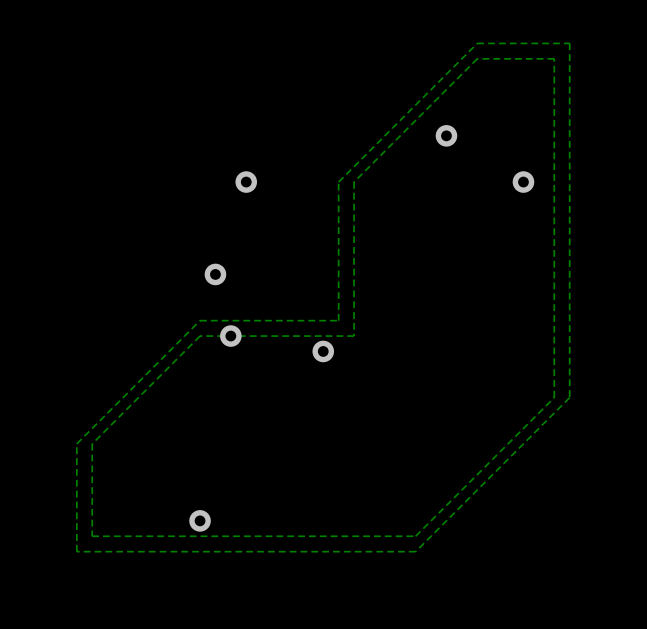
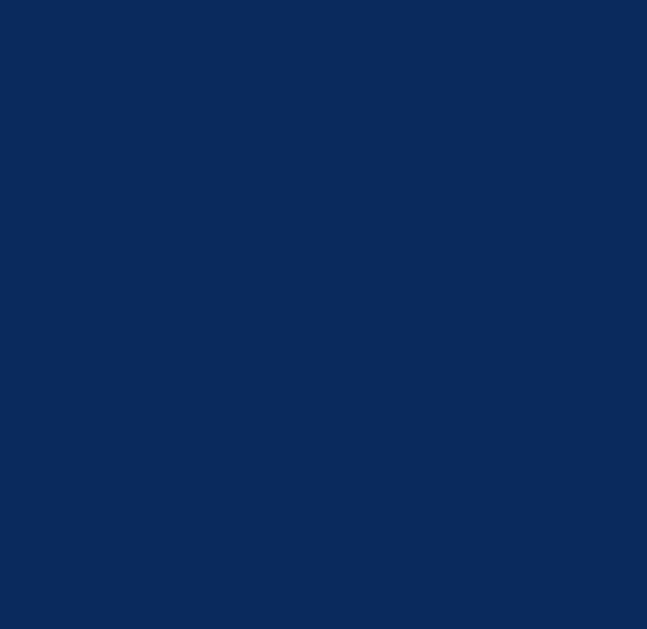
zone outline: (569, 43) (477, 43) (338, 182) (338, 320) (200, 320) (76, 443) (76, 551) (415, 551) (569, 397) (569, 43) -> none
zone outline: (554, 58) (554, 397) (415, 536) (92, 536) (92, 443) (200, 336) (354, 336) (354, 182) (477, 58) (554, 58) -> none
via: (446, 135) -> none
via: (246, 182) -> none
via: (523, 182) -> none
via: (215, 274) -> none
via: (230, 336) -> none
via: (323, 351) -> none
via: (200, 520) -> none

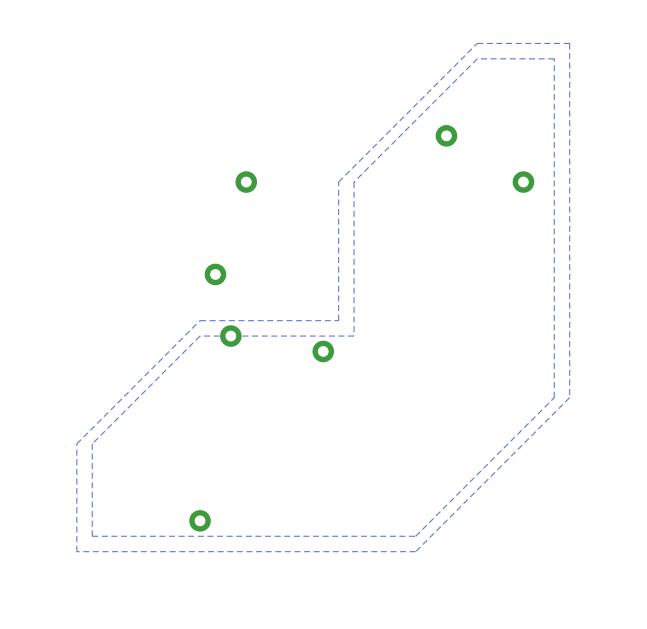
zone outline: none -> (569, 43) (477, 43) (338, 182) (338, 320) (200, 320) (76, 443) (76, 551) (415, 551) (569, 397) (569, 43)
zone outline: none -> (554, 58) (554, 397) (415, 536) (92, 536) (92, 443) (200, 336) (354, 336) (354, 182) (477, 58) (554, 58)
via: none -> (446, 135)
via: none -> (246, 182)
via: none -> (523, 182)
via: none -> (215, 274)
via: none -> (230, 336)
via: none -> (323, 351)
via: none -> (200, 520)

